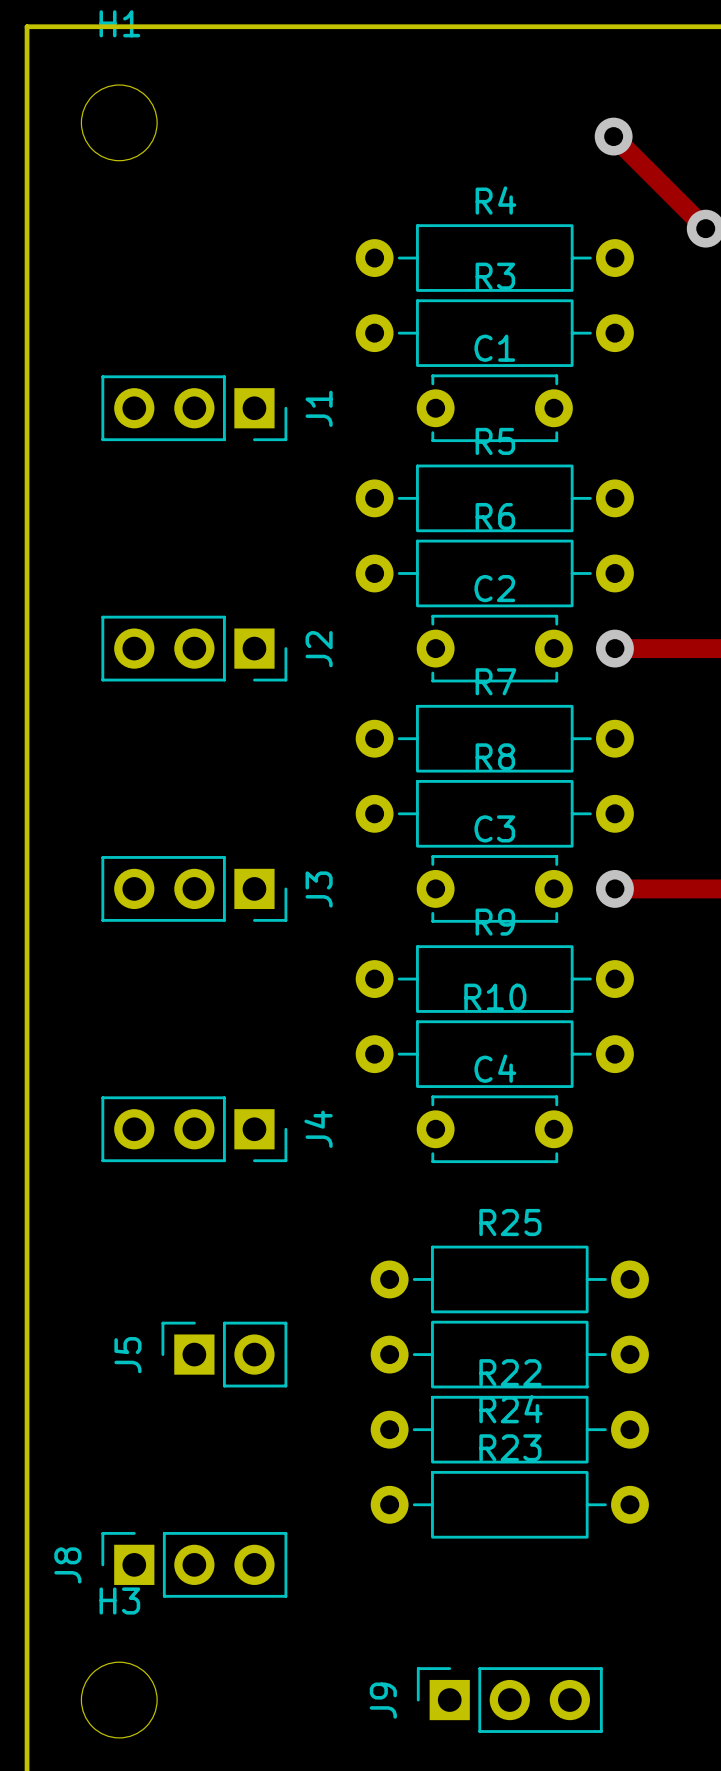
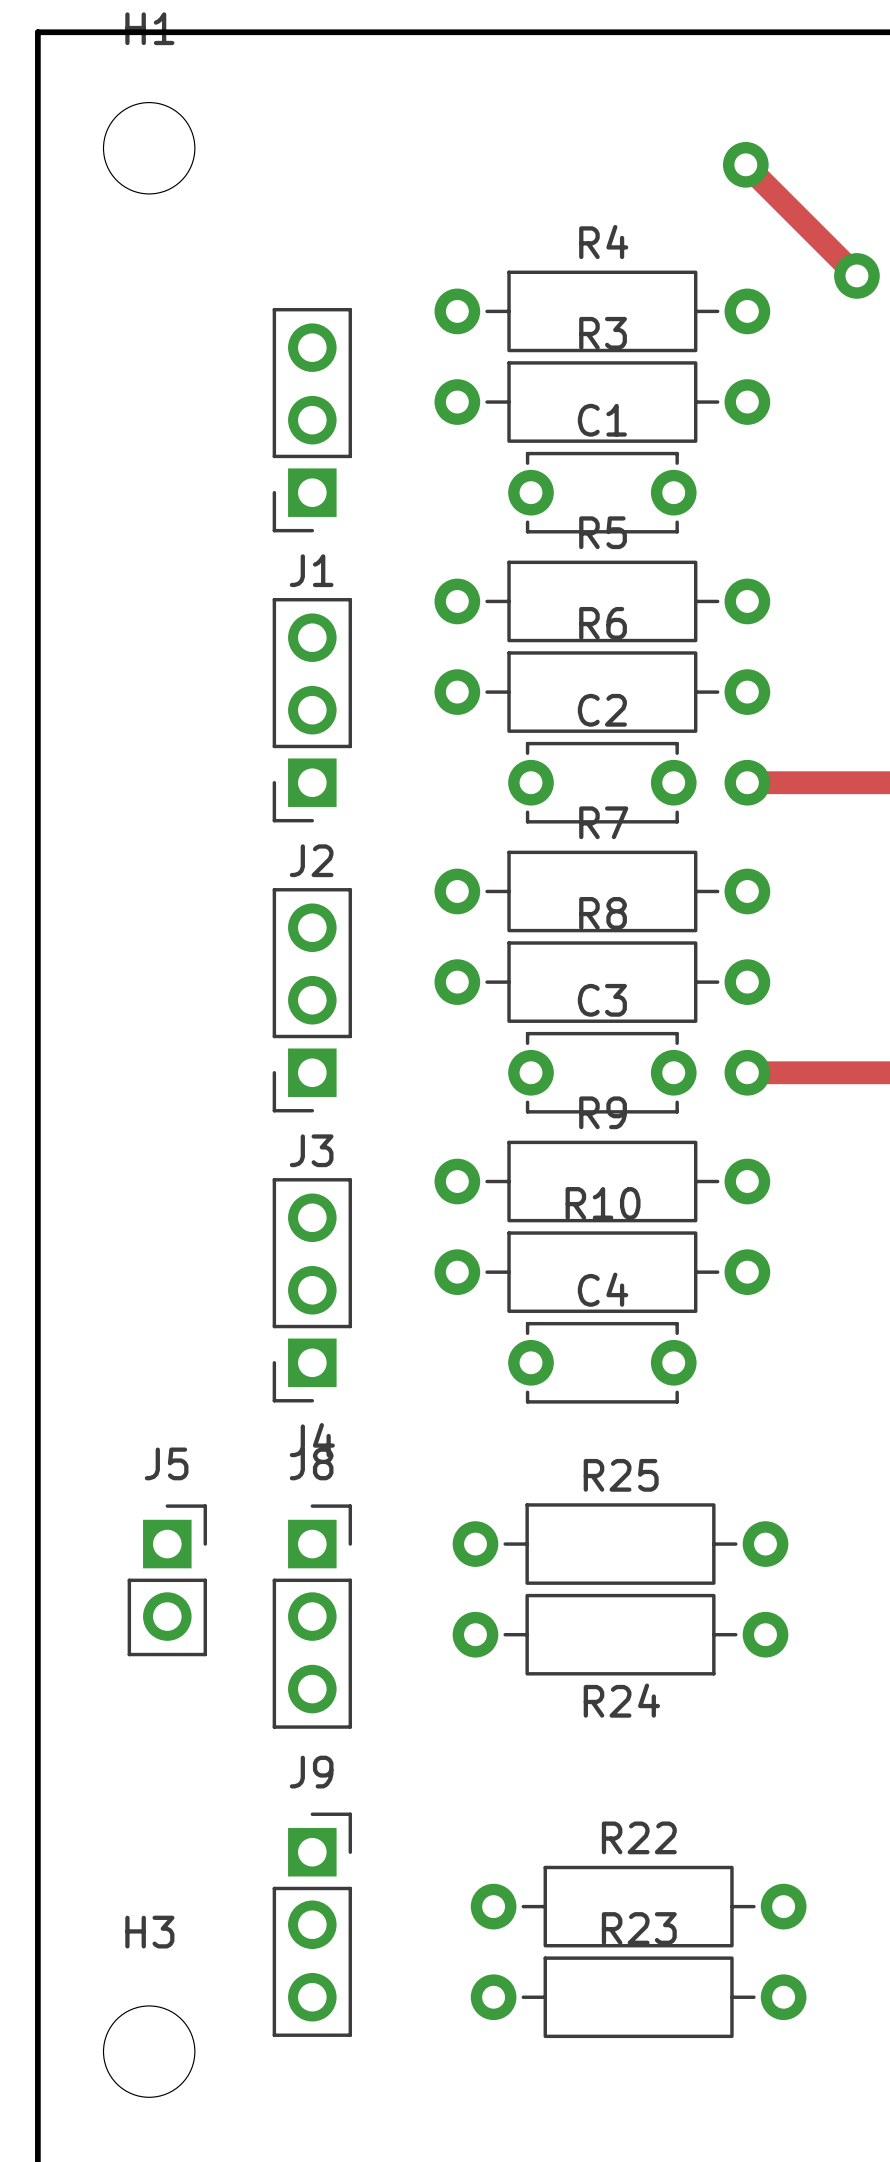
J1 rotation: 0° (194, 408) -> 90° clockwise (312, 420)
J2 rotation: 0° (194, 648) -> 90° clockwise (312, 710)
J3 rotation: 0° (194, 888) -> 90° clockwise (312, 1000)
J4 rotation: 0° (194, 1129) -> 90° clockwise (312, 1290)
J5 rotation: 0° (224, 1354) -> 90° clockwise (167, 1580)
J5 position: (224, 1354) -> (167, 1580)
R22 position: (509, 1429) -> (638, 1906)
R23 position: (509, 1504) -> (638, 1997)
J8 rotation: 0° (194, 1564) -> 90° clockwise (312, 1616)
J8 position: (194, 1564) -> (312, 1616)
J9 rotation: 0° (509, 1700) -> 90° clockwise (312, 1924)
J9 position: (509, 1700) -> (312, 1924)

